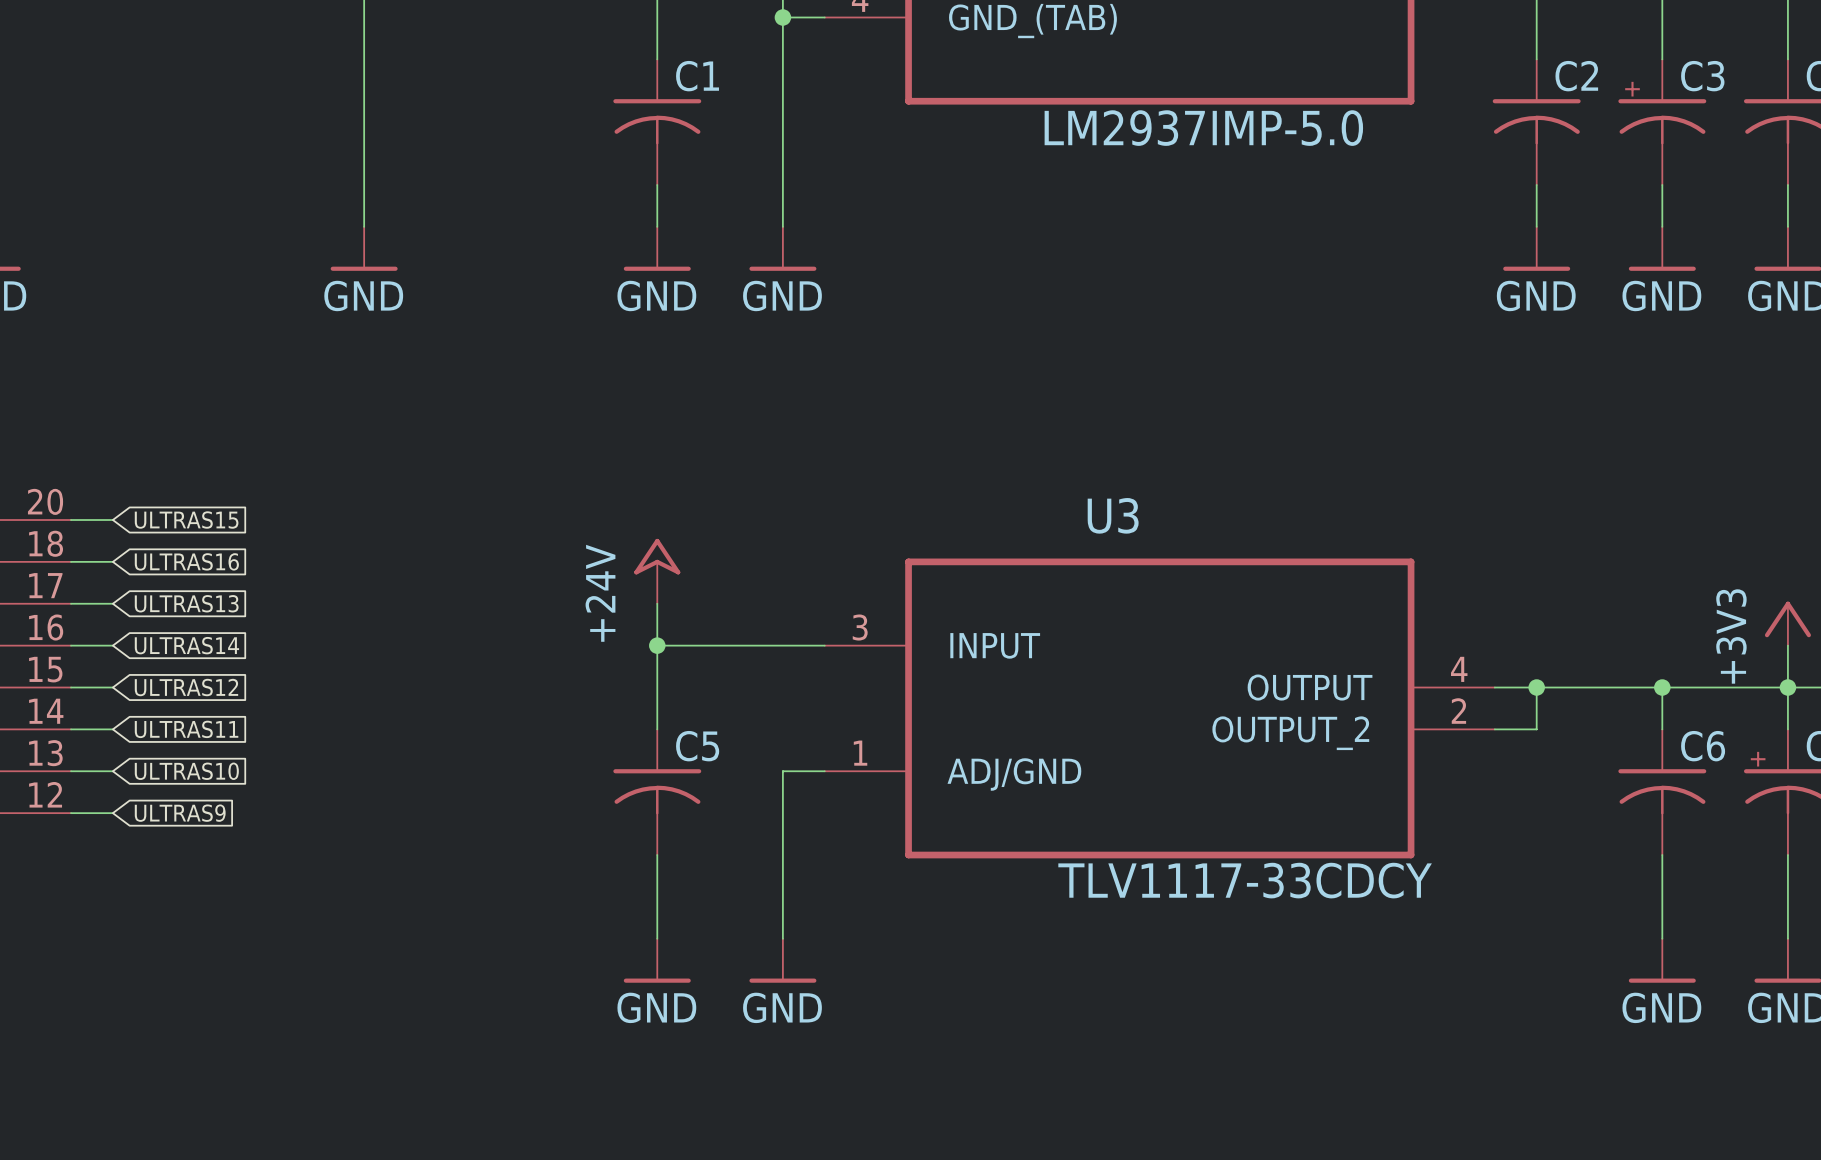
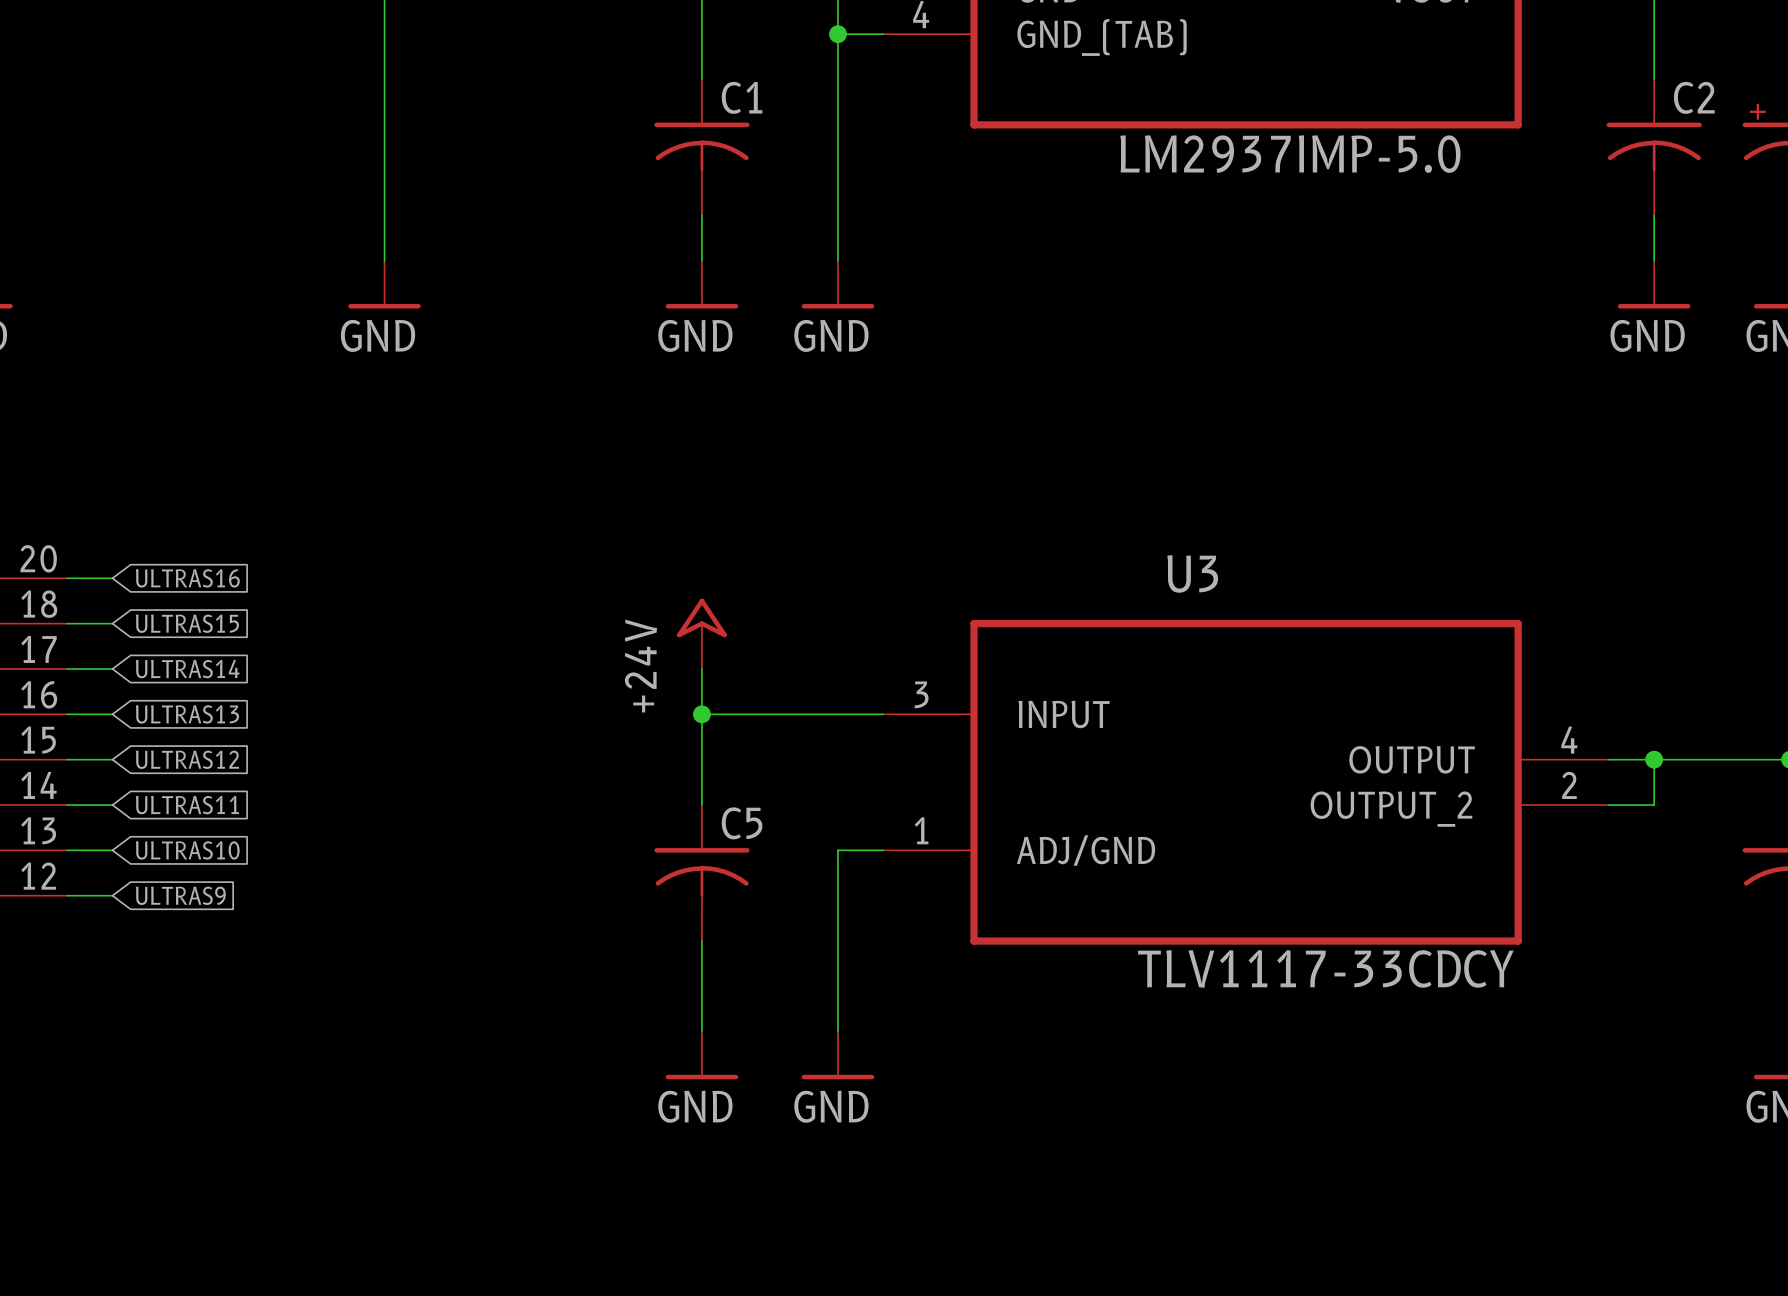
global label: ULTRAS15 (186, 520) -> ULTRAS16 (187, 578)
global label: ULTRAS16 (186, 561) -> ULTRAS15 (187, 623)
global label: ULTRAS13 (186, 603) -> ULTRAS14 (187, 669)
global label: ULTRAS14 (186, 645) -> ULTRAS13 (187, 714)

